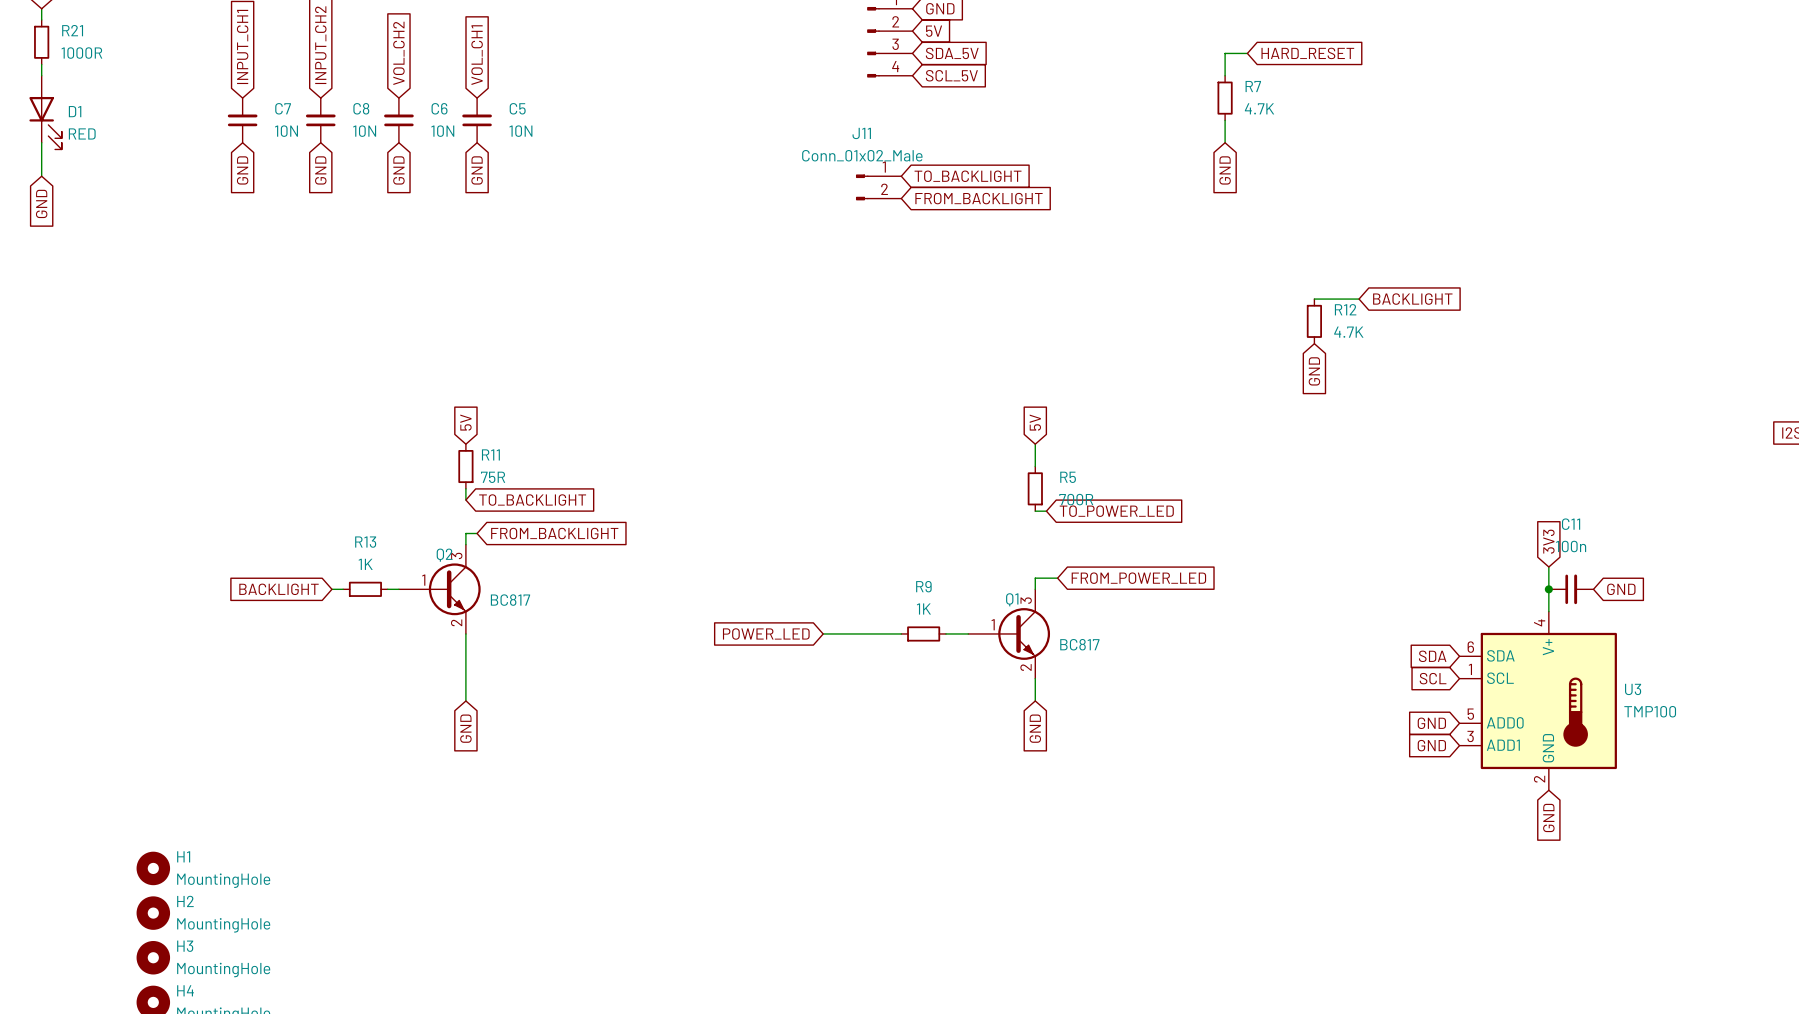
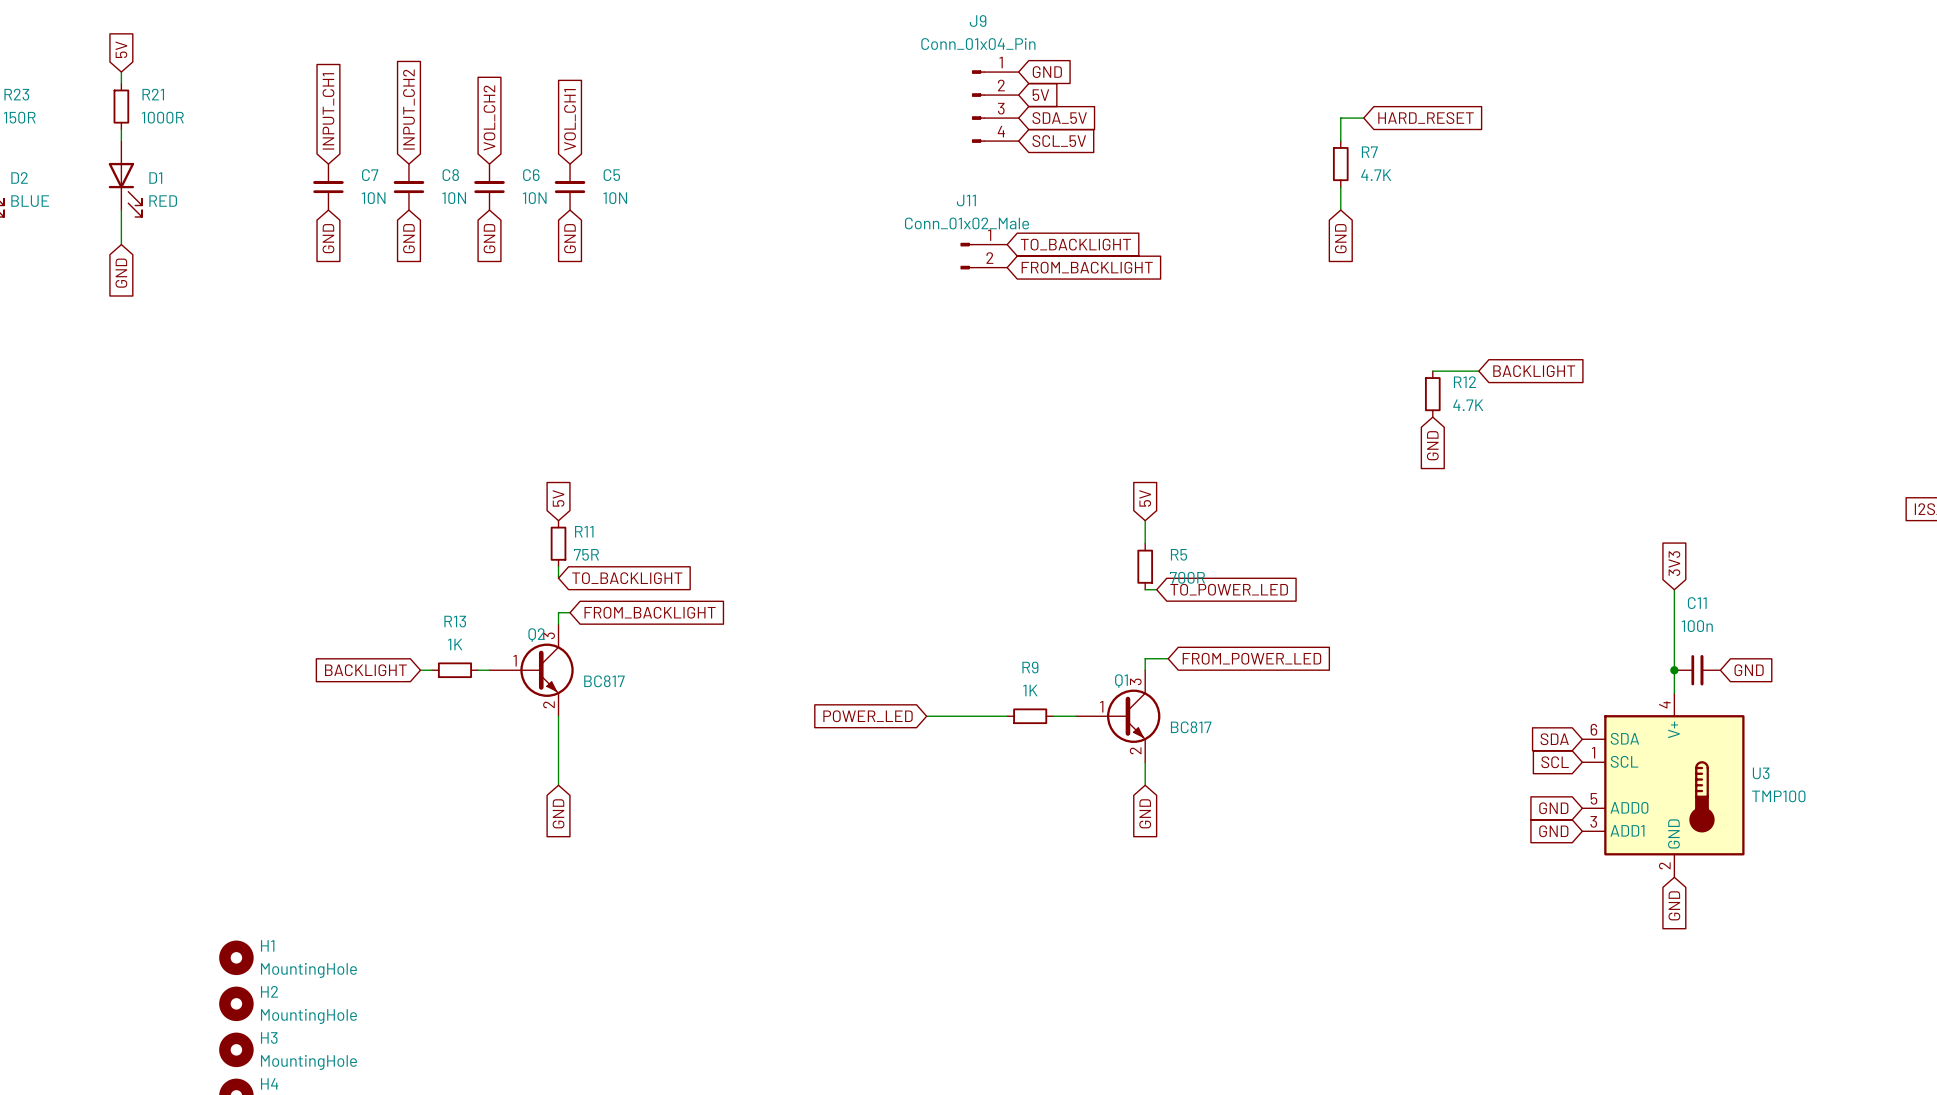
wire: none -> (1674, 589) (1674, 647)
global label position: 3V3 (1548, 541) -> 3V3 (1674, 563)

